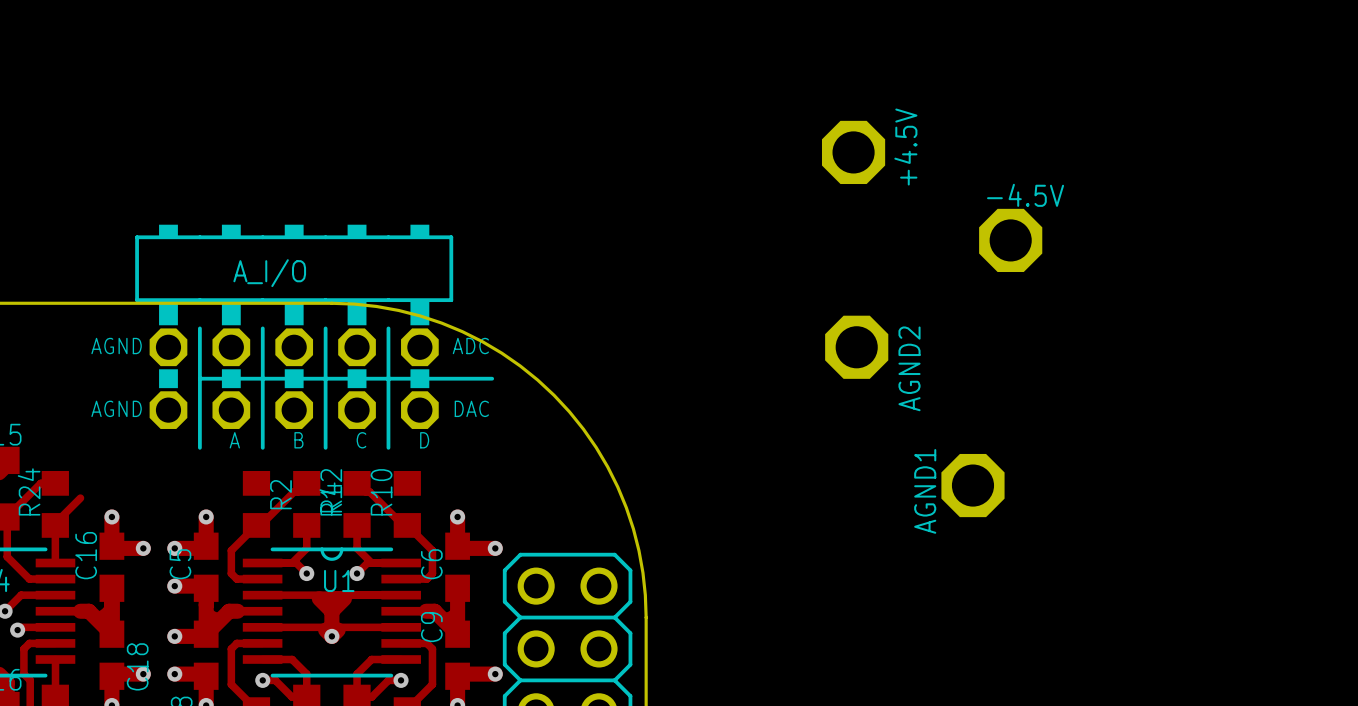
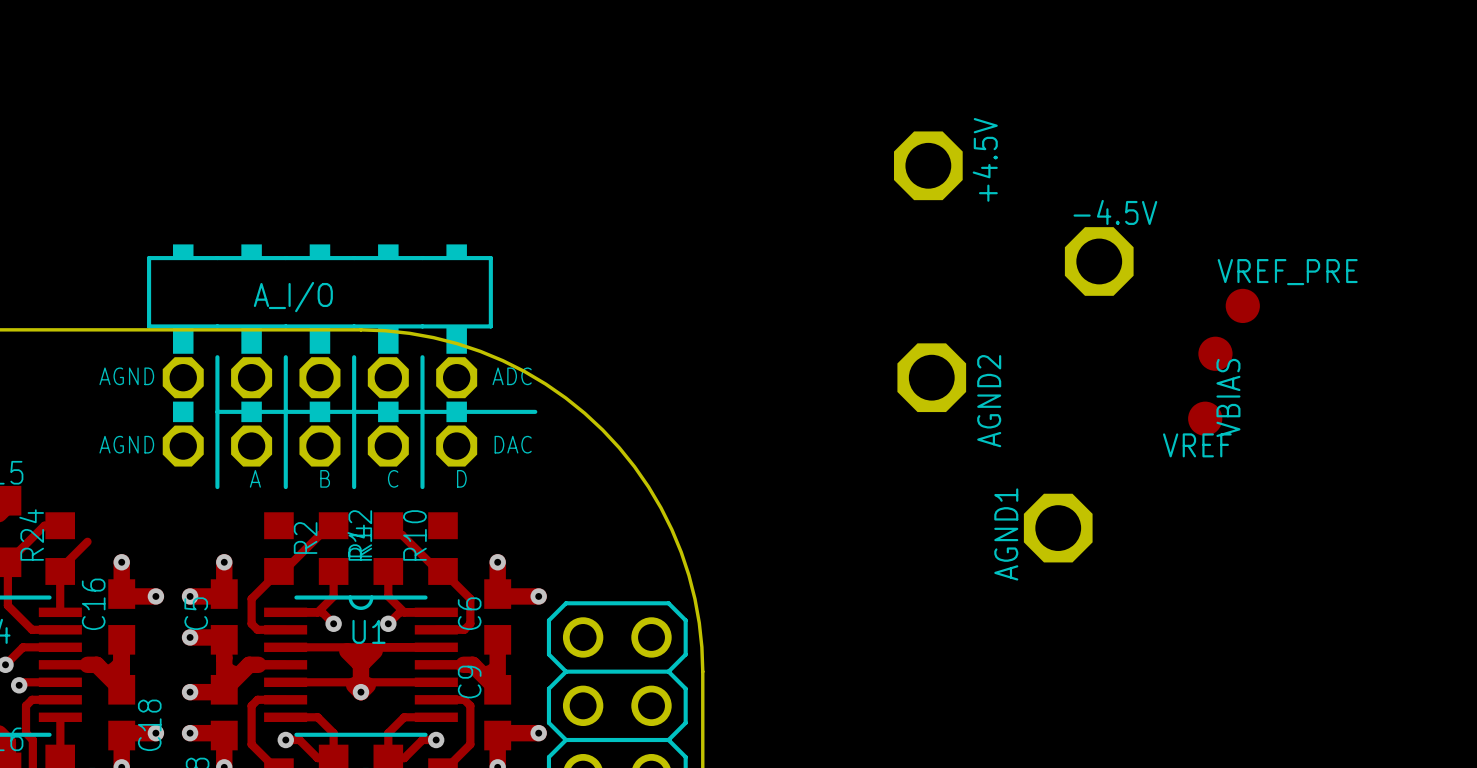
VREF_PRE: none -> (1242, 305)
VBIAS: none -> (1215, 353)
VREF: none -> (1205, 418)

